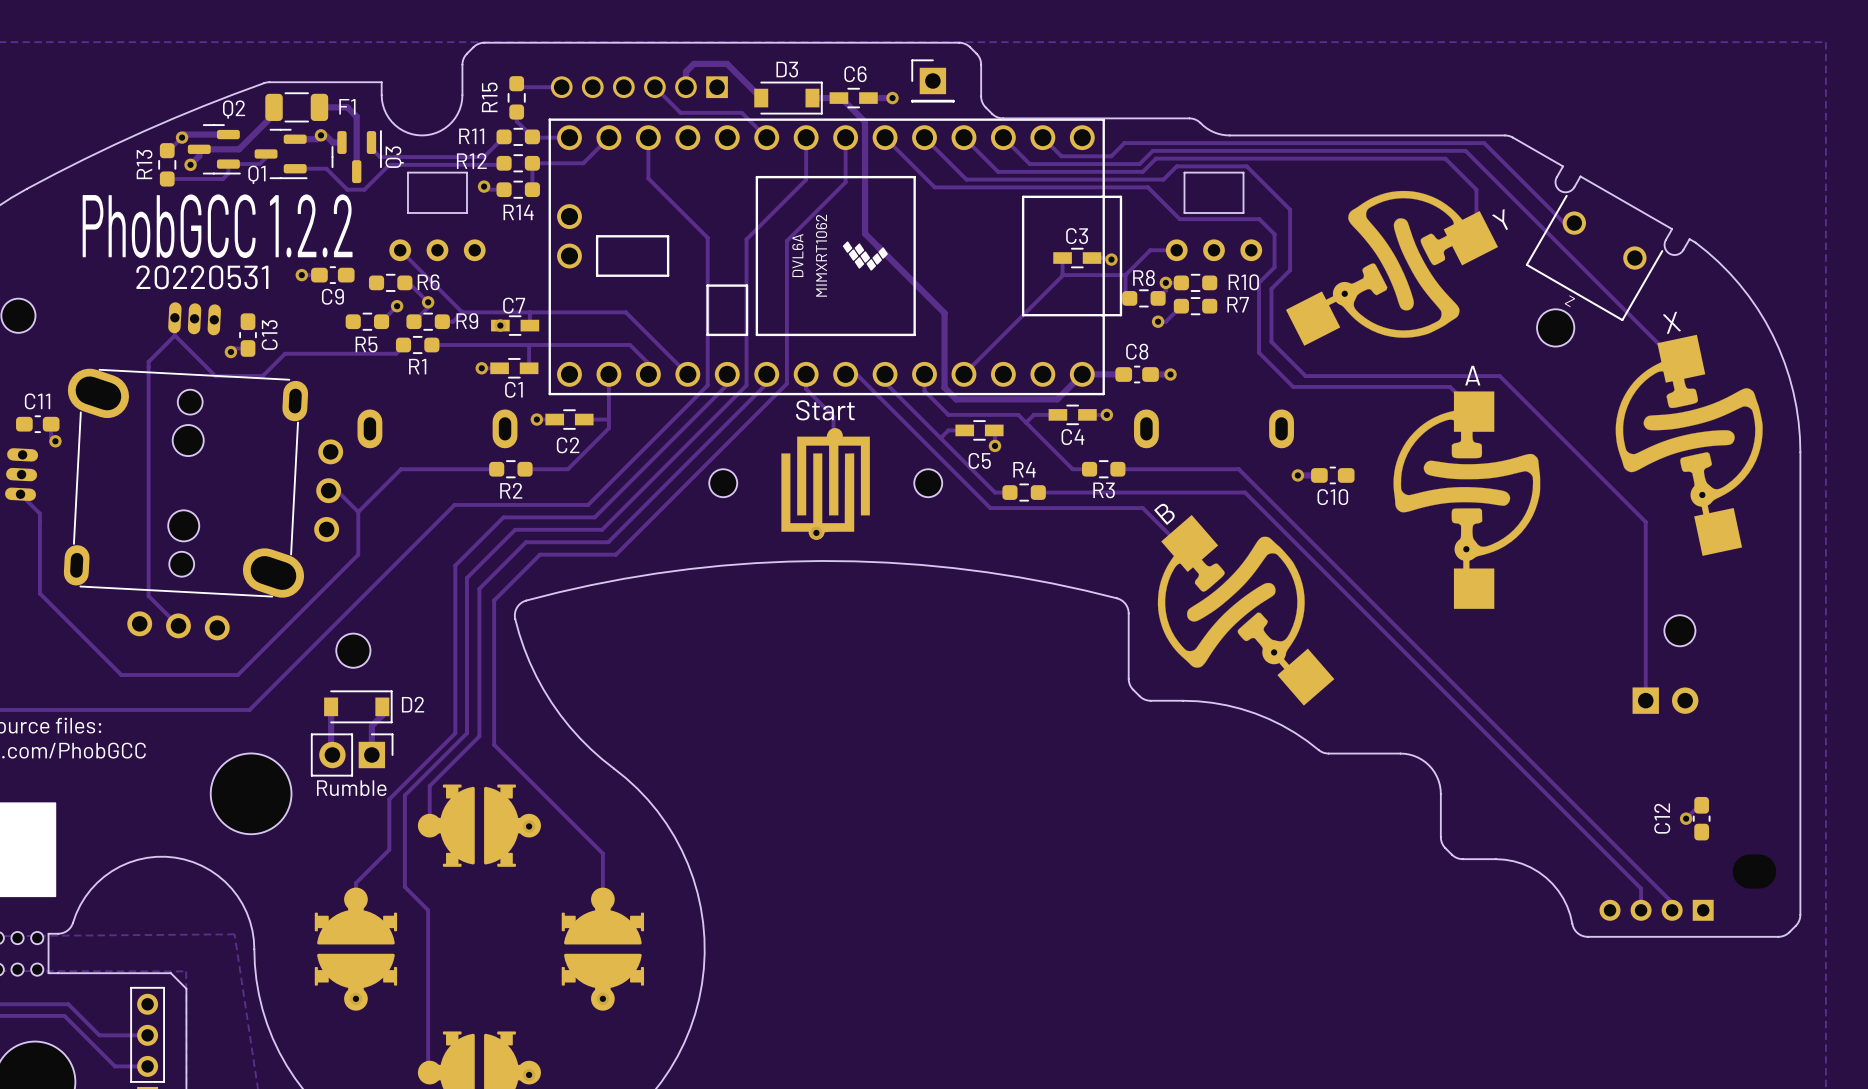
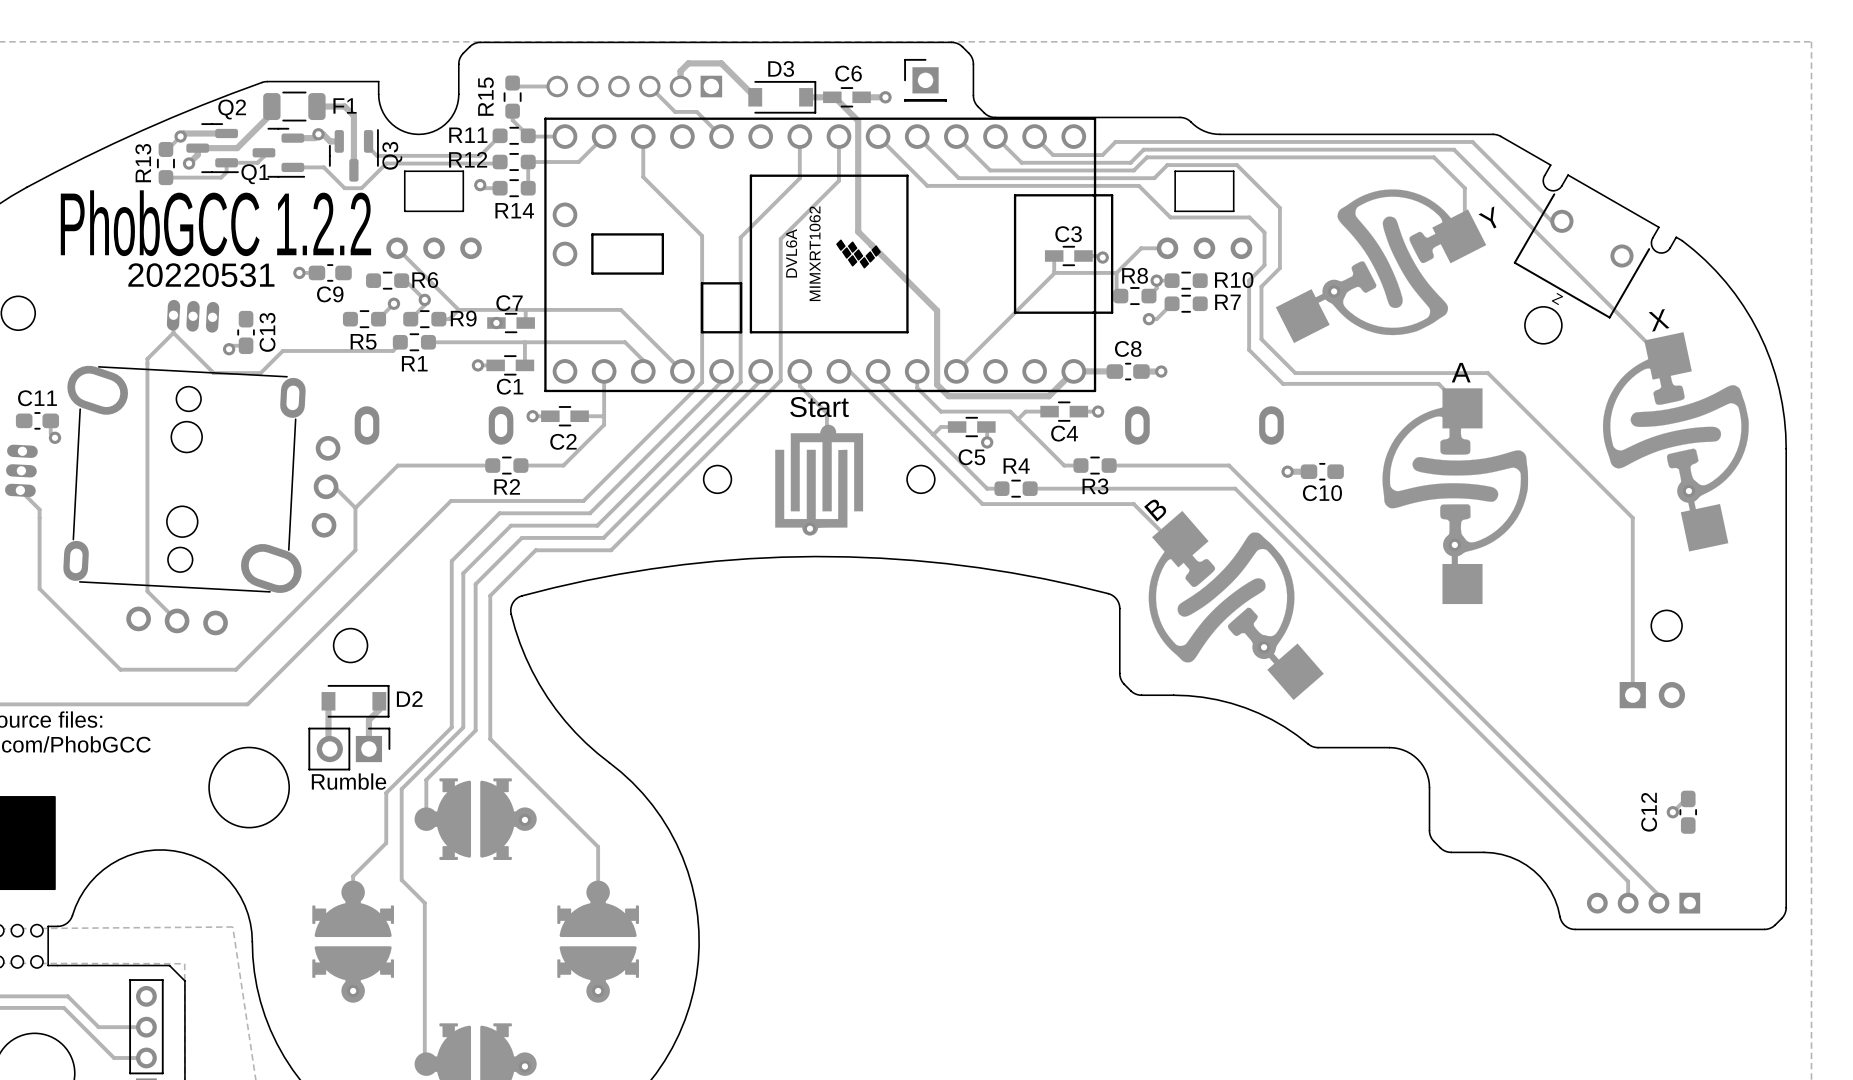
track: (702, 112) (741, 112) (766, 137) -> (696, 111) (721, 136)

